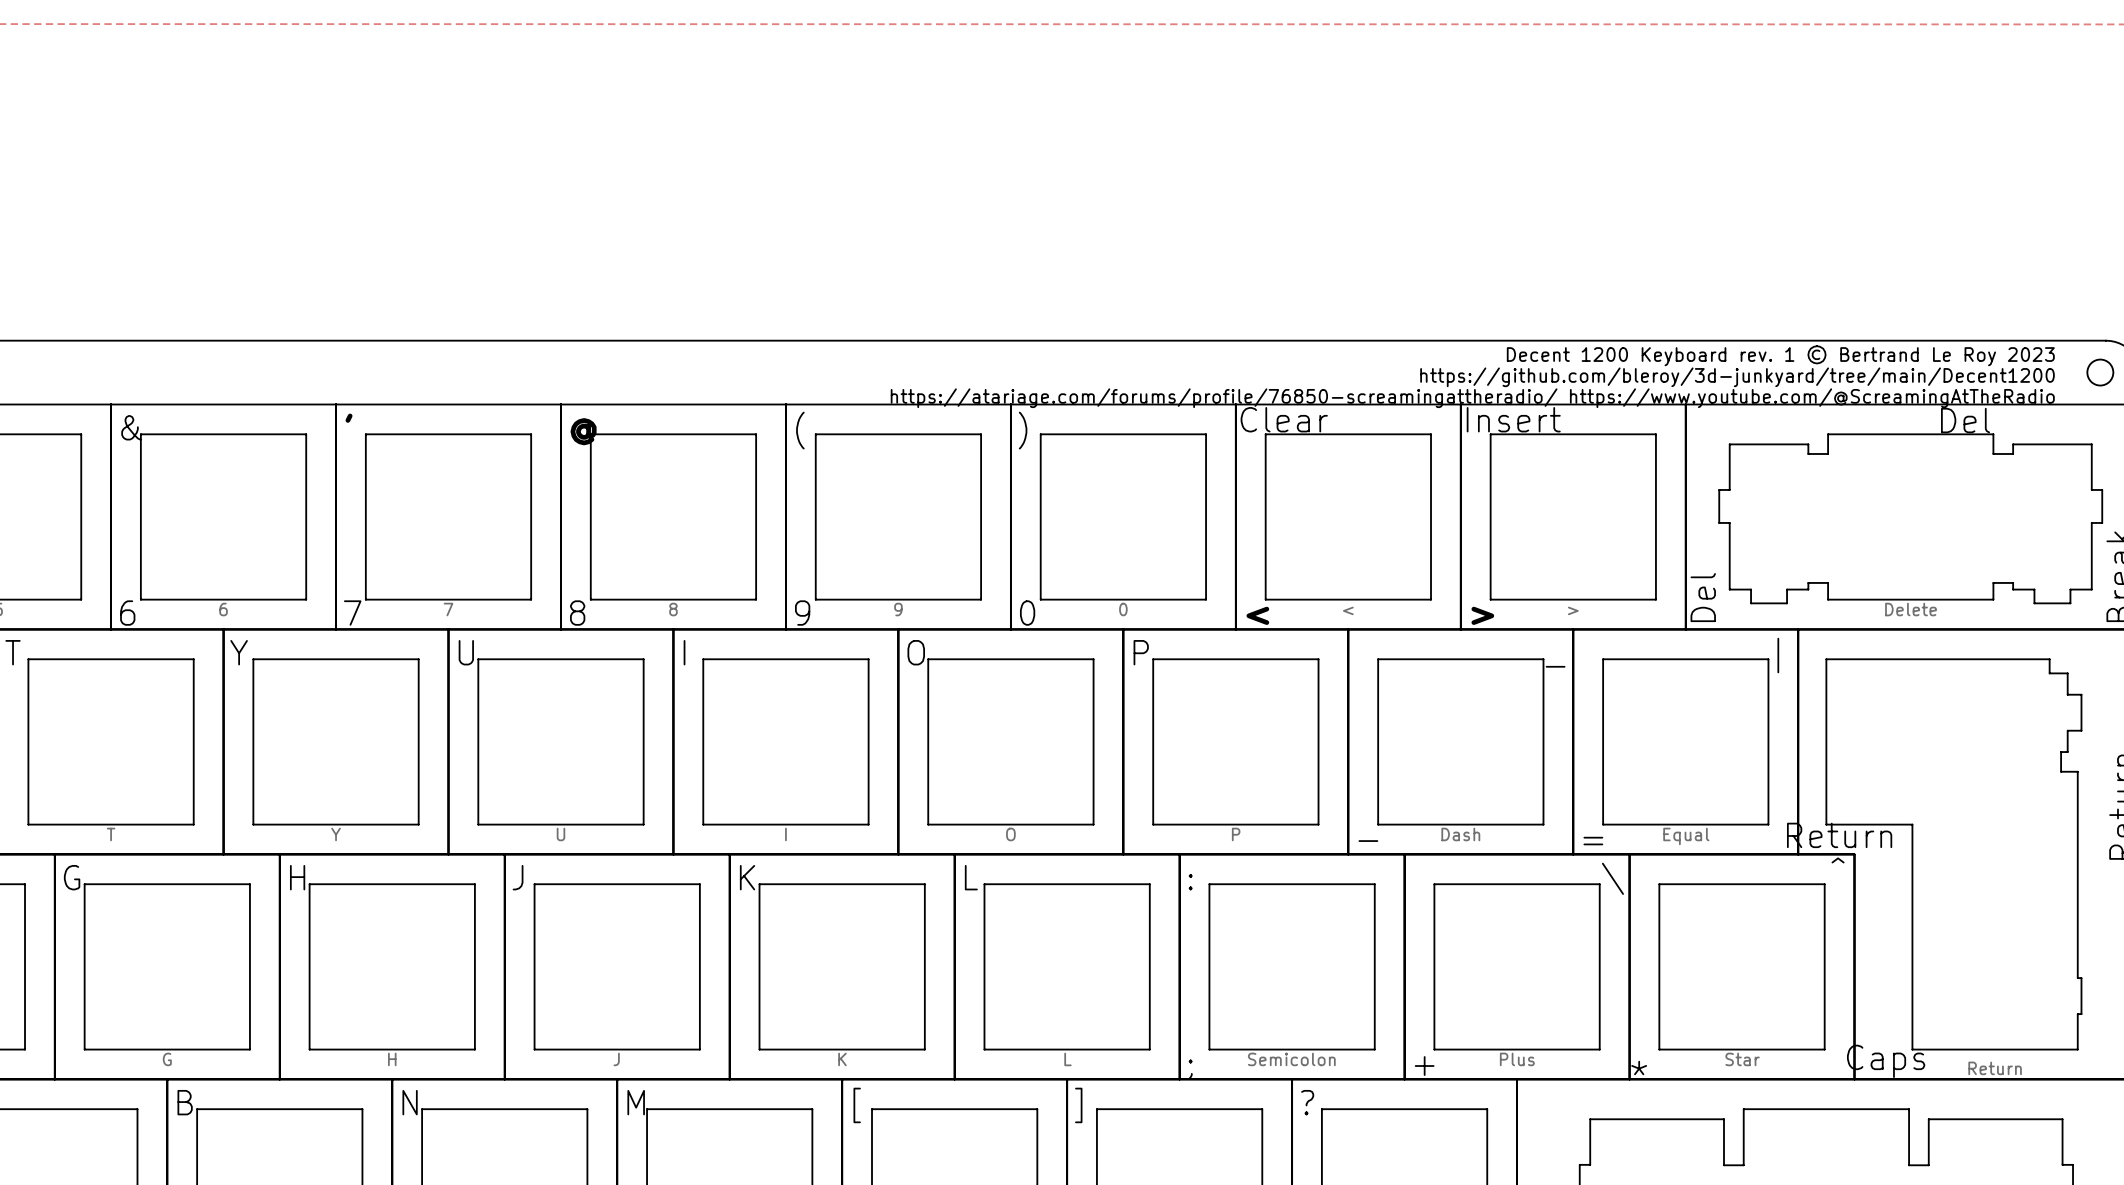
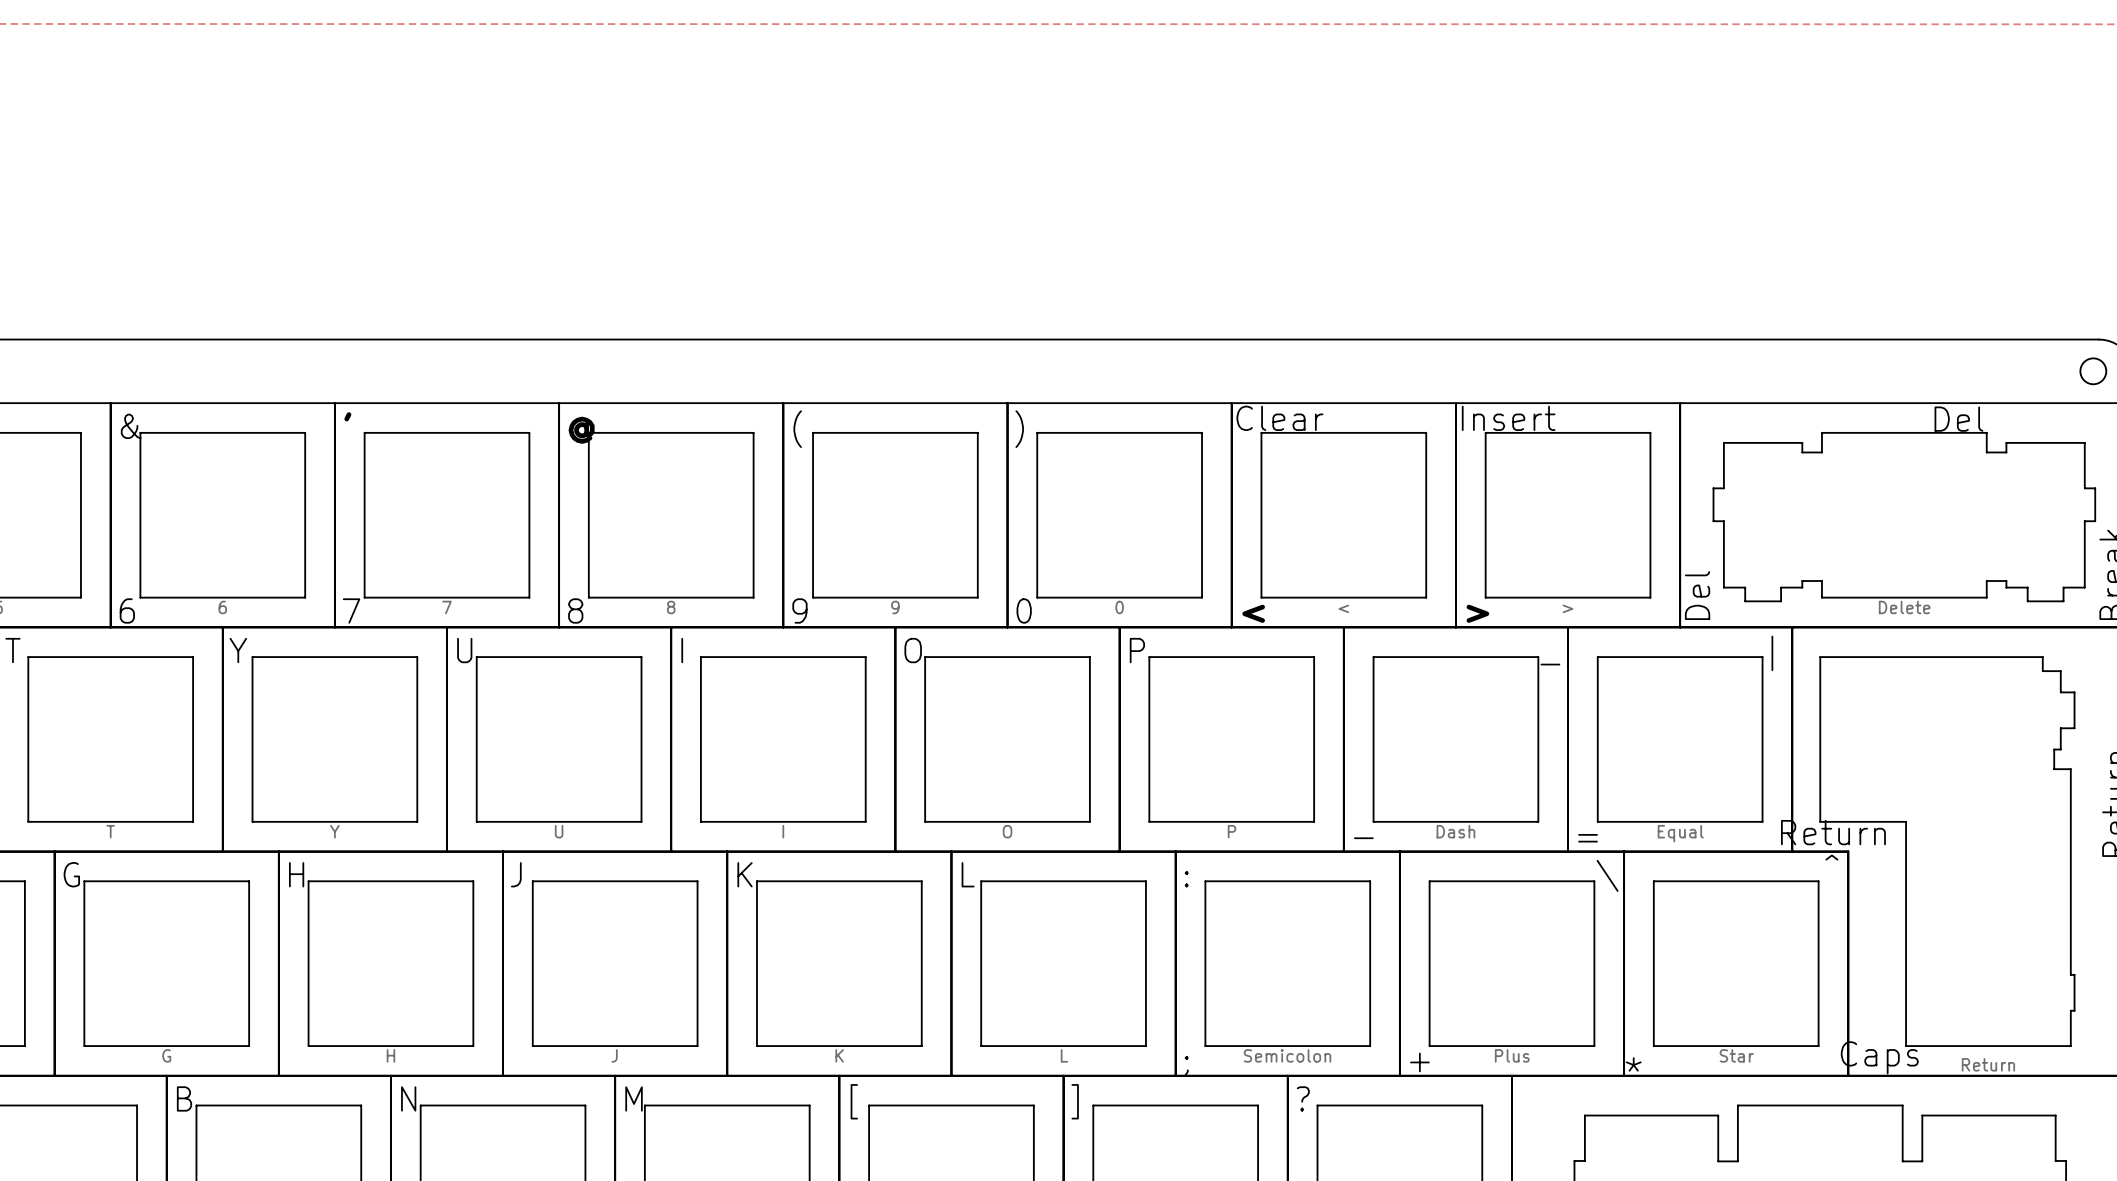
text: Decent 1200 Keyboard rev. 1 © Bertrand Le Roy 2023 (1780, 355) -> none
text: https://github.com/bleroy/3d-junkyard/tree/main/Decent1200 (1737, 377) -> none
text: https://atariage.com/forums/profile/76850-screamingattheradio/ https://www.youtube.com/@ScreamingAtTheRadio (1472, 398) -> none

